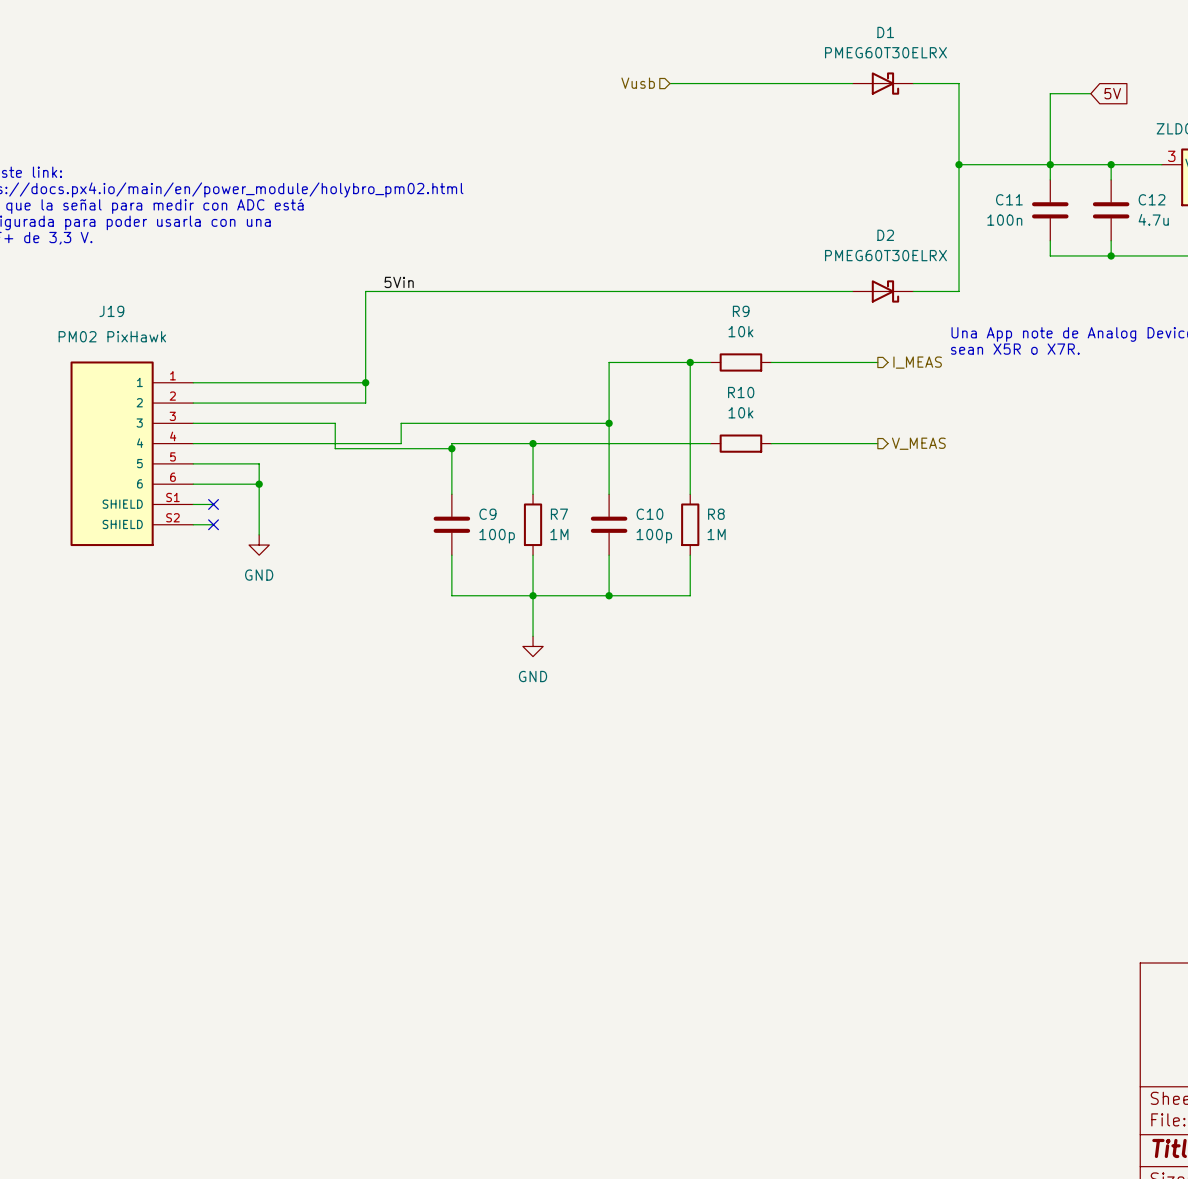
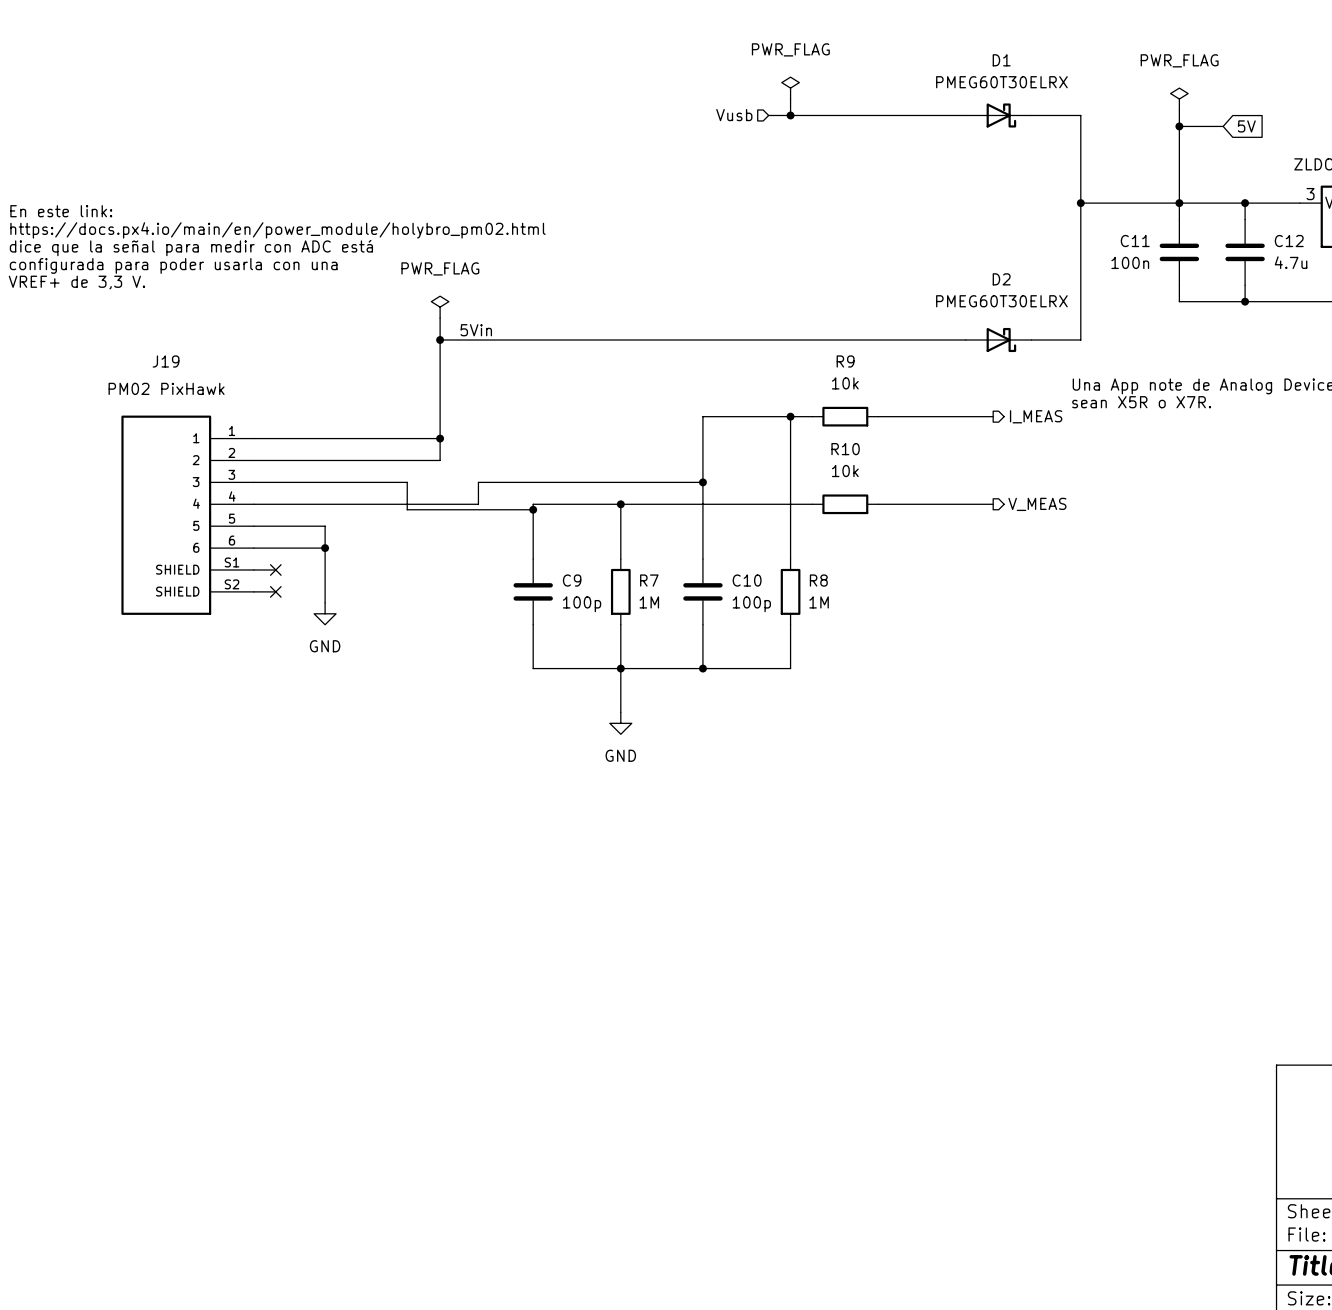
power symbol: none -> PWR_FLAG (790, 88)
wire: none -> (790, 99) (790, 115)
power symbol: none -> PWR_FLAG (1179, 99)
wire: none -> (1179, 110) (1179, 126)
junction: none -> (790, 115)
junction: none -> (1179, 126)
power symbol: none -> PWR_FLAG (440, 307)
wire: none -> (440, 318) (440, 340)
junction: none -> (440, 340)

